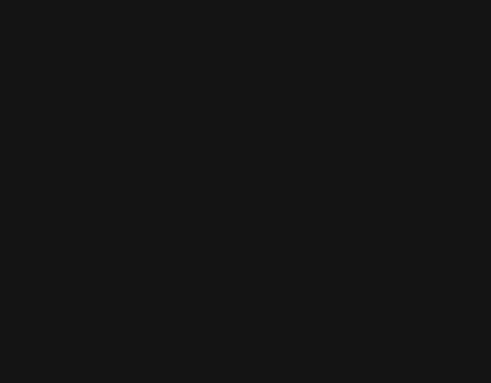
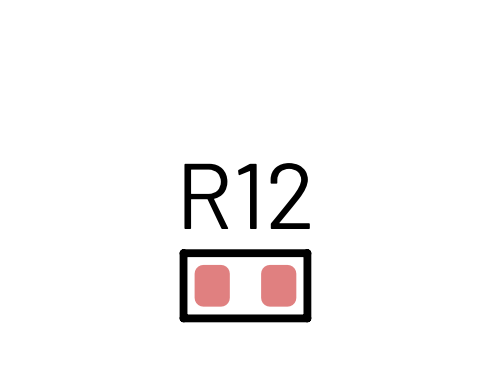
R12: none -> (245, 285)

